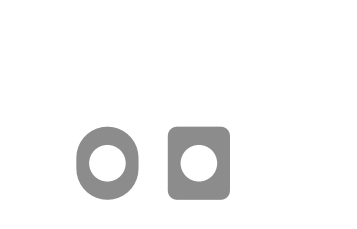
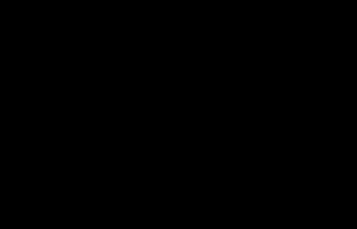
part: (153, 163) -> none

